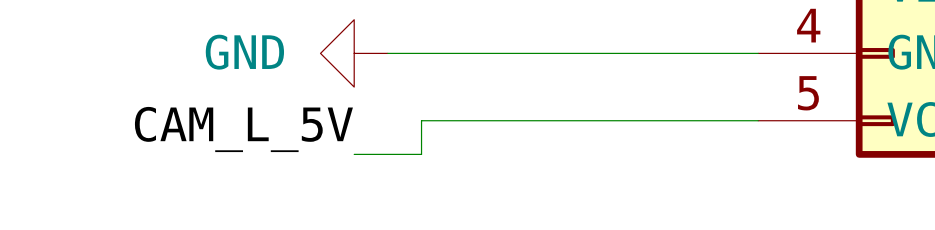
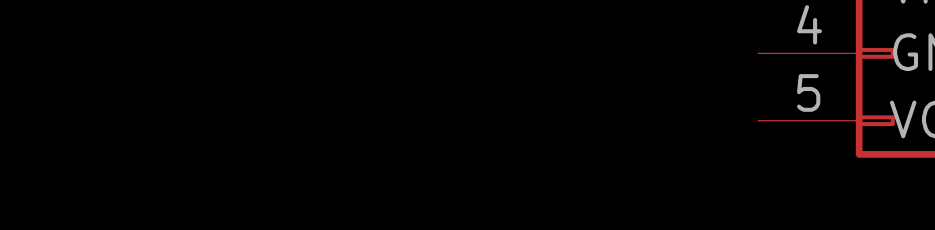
power symbol: GND (354, 53) -> none
wire: (387, 53) (758, 53) -> none
wire: (758, 120) (421, 120) (421, 154) (354, 154) -> none
label: CAM_L_5V (243, 129) -> none

